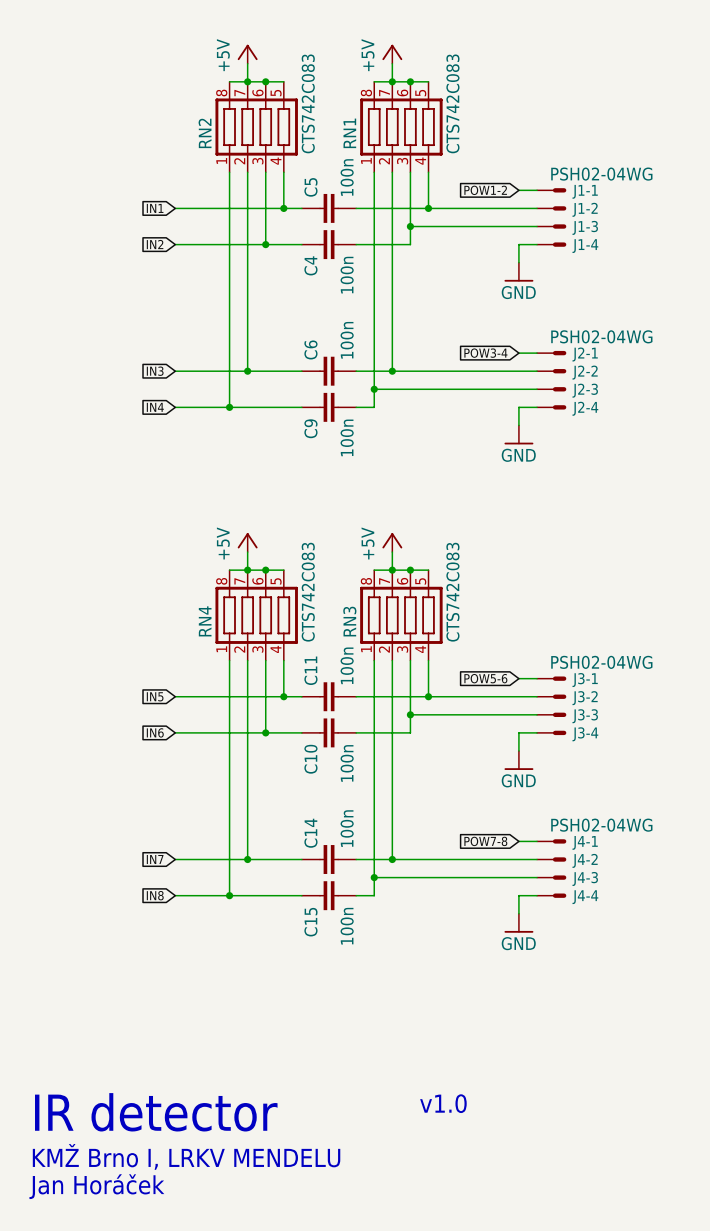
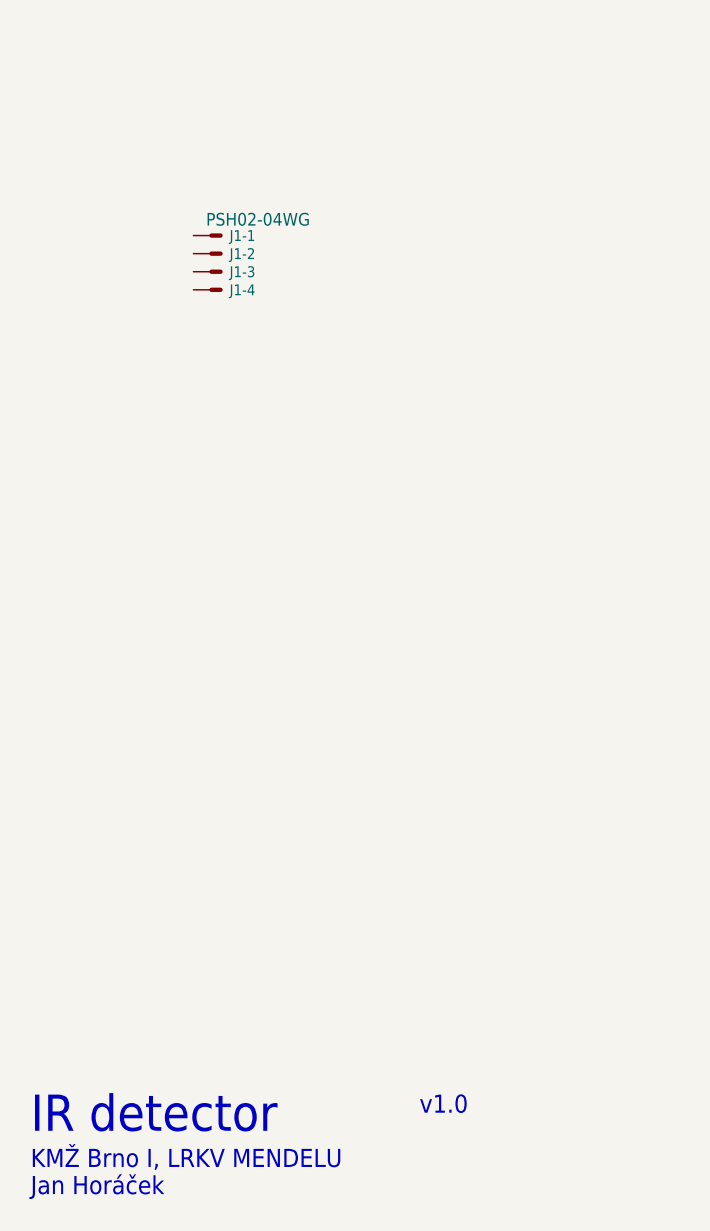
power symbol: +5V (247, 54) -> none
power symbol: +5V (392, 54) -> none
wire: (247, 63) (247, 81) -> none
wire: (392, 63) (392, 81) -> none
wire: (229, 81) (283, 81) -> none
junction: (247, 81) -> none
junction: (265, 81) -> none
wire: (374, 81) (428, 81) -> none
junction: (392, 81) -> none
junction: (410, 81) -> none
RN2: CTS742C083 (256, 127) -> none
RN1: CTS742C083 (401, 127) -> none
wire: (229, 172) (229, 407) -> none
wire: (247, 172) (247, 371) -> none
wire: (265, 172) (265, 244) -> none
wire: (283, 172) (283, 208) -> none
wire: (374, 172) (374, 407) (356, 407) -> none
wire: (392, 172) (392, 371) -> none
wire: (410, 172) (410, 244) (356, 244) -> none
wire: (428, 172) (428, 208) -> none
global label: POW1-2 (485, 190) -> none
wire: (518, 190) (537, 190) -> none
J1-1 position: (551, 190) -> (208, 235)
global label: IN1 (155, 208) -> none
wire: (175, 208) (301, 208) -> none
junction: (283, 208) -> none
C5: 100n (329, 208) -> none
wire: (356, 208) (537, 208) -> none
junction: (428, 208) -> none
J1-2 position: (551, 208) -> (208, 253)
wire: (410, 226) (537, 226) -> none
junction: (410, 226) -> none
J1-3 position: (551, 226) -> (208, 271)
global label: IN2 (155, 244) -> none
wire: (175, 244) (301, 244) -> none
junction: (265, 244) -> none
C4: 100n (329, 244) -> none
wire: (537, 244) (518, 244) (518, 262) -> none
J1-4 position: (551, 244) -> (208, 289)
power symbol: GND (518, 272) -> none
global label: POW3-4 (485, 353) -> none
wire: (518, 353) (537, 353) -> none
J2-1: PSH02-04WG (551, 353) -> none
global label: IN3 (155, 371) -> none
wire: (175, 371) (301, 371) -> none
junction: (247, 371) -> none
C6: 100n (329, 371) -> none
wire: (356, 371) (537, 371) -> none
junction: (392, 371) -> none
J2-2: (551, 371) -> none
wire: (374, 389) (537, 389) -> none
junction: (374, 389) -> none
J2-3: (551, 389) -> none
global label: IN4 (155, 407) -> none
wire: (175, 407) (301, 407) -> none
junction: (229, 407) -> none
C9: 100n (329, 407) -> none
wire: (537, 407) (518, 407) (518, 425) -> none
J2-4: (551, 407) -> none
power symbol: GND (518, 434) -> none
power symbol: +5V (247, 542) -> none
power symbol: +5V (392, 542) -> none
wire: (247, 552) (247, 570) -> none
wire: (392, 552) (392, 570) -> none
wire: (229, 570) (283, 570) -> none
junction: (247, 570) -> none
junction: (265, 570) -> none
wire: (374, 570) (428, 570) -> none
junction: (392, 570) -> none
junction: (410, 570) -> none
RN4: CTS742C083 (256, 615) -> none
RN3: CTS742C083 (401, 615) -> none
wire: (229, 660) (229, 895) -> none
wire: (247, 660) (247, 859) -> none
wire: (265, 660) (265, 732) -> none
wire: (283, 660) (283, 696) -> none
wire: (374, 660) (374, 895) (356, 895) -> none
wire: (392, 660) (392, 859) -> none
wire: (410, 660) (410, 732) (356, 732) -> none
wire: (428, 660) (428, 696) -> none
global label: POW5-6 (485, 678) -> none
wire: (518, 678) (537, 678) -> none
J3-1: PSH02-04WG (551, 678) -> none
global label: IN5 (155, 696) -> none
wire: (175, 696) (301, 696) -> none
junction: (283, 696) -> none
C11: 100n (329, 696) -> none
wire: (356, 696) (537, 696) -> none
junction: (428, 696) -> none
J3-2: (551, 696) -> none
wire: (410, 714) (537, 714) -> none
junction: (410, 714) -> none
J3-3: (551, 714) -> none
global label: IN6 (155, 732) -> none
wire: (175, 732) (301, 732) -> none
junction: (265, 732) -> none
C10: 100n (329, 732) -> none
wire: (537, 732) (518, 732) (518, 750) -> none
J3-4: (551, 732) -> none
power symbol: GND (518, 760) -> none
global label: POW7-8 (485, 841) -> none
wire: (518, 841) (537, 841) -> none
J4-1: PSH02-04WG (551, 841) -> none
global label: IN7 (155, 859) -> none
wire: (175, 859) (301, 859) -> none
junction: (247, 859) -> none
C14: 100n (329, 859) -> none
wire: (356, 859) (537, 859) -> none
junction: (392, 859) -> none
J4-2: (551, 859) -> none
wire: (374, 877) (537, 877) -> none
junction: (374, 877) -> none
J4-3: (551, 877) -> none
global label: IN8 (155, 895) -> none
wire: (175, 895) (301, 895) -> none
junction: (229, 895) -> none
C15: 100n (329, 895) -> none
wire: (537, 895) (518, 895) (518, 913) -> none
J4-4: (551, 895) -> none
power symbol: GND (518, 923) -> none

